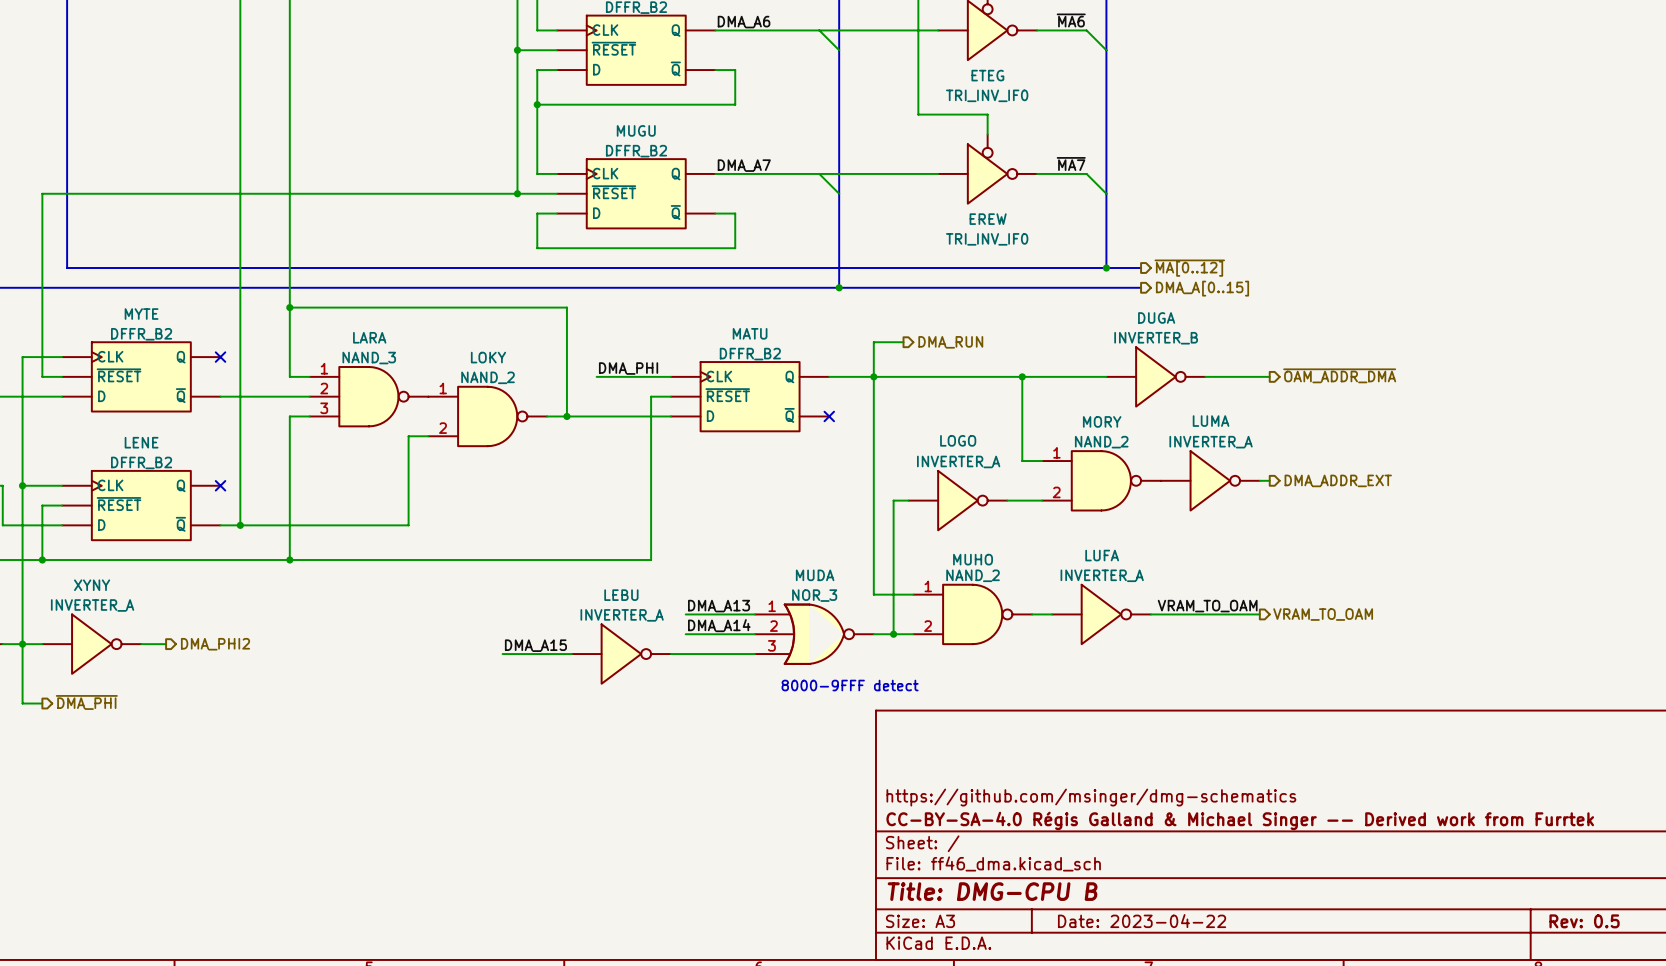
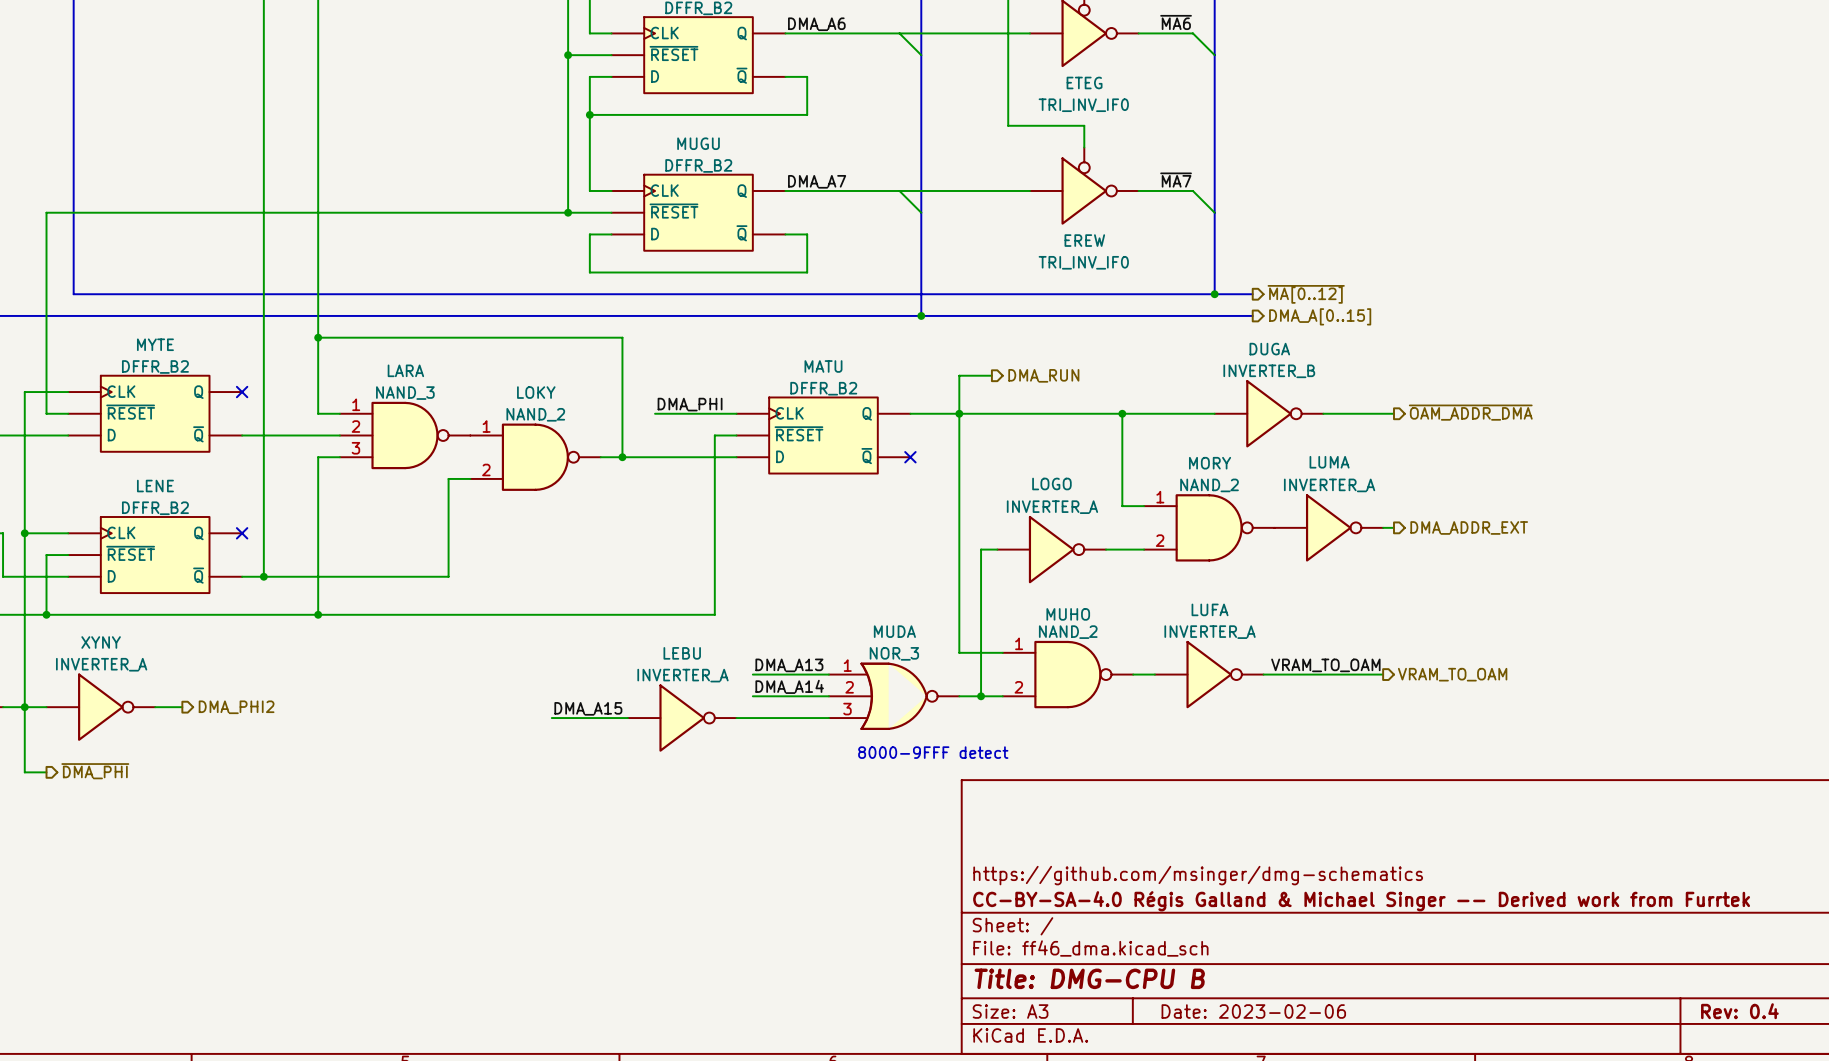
title block: Date: 2023-04-22 (1142, 921) -> Date: 2023-02-06 (1253, 1011)
title block: Rev: 0.5 (1584, 921) -> Rev: 0.4 (1739, 1011)

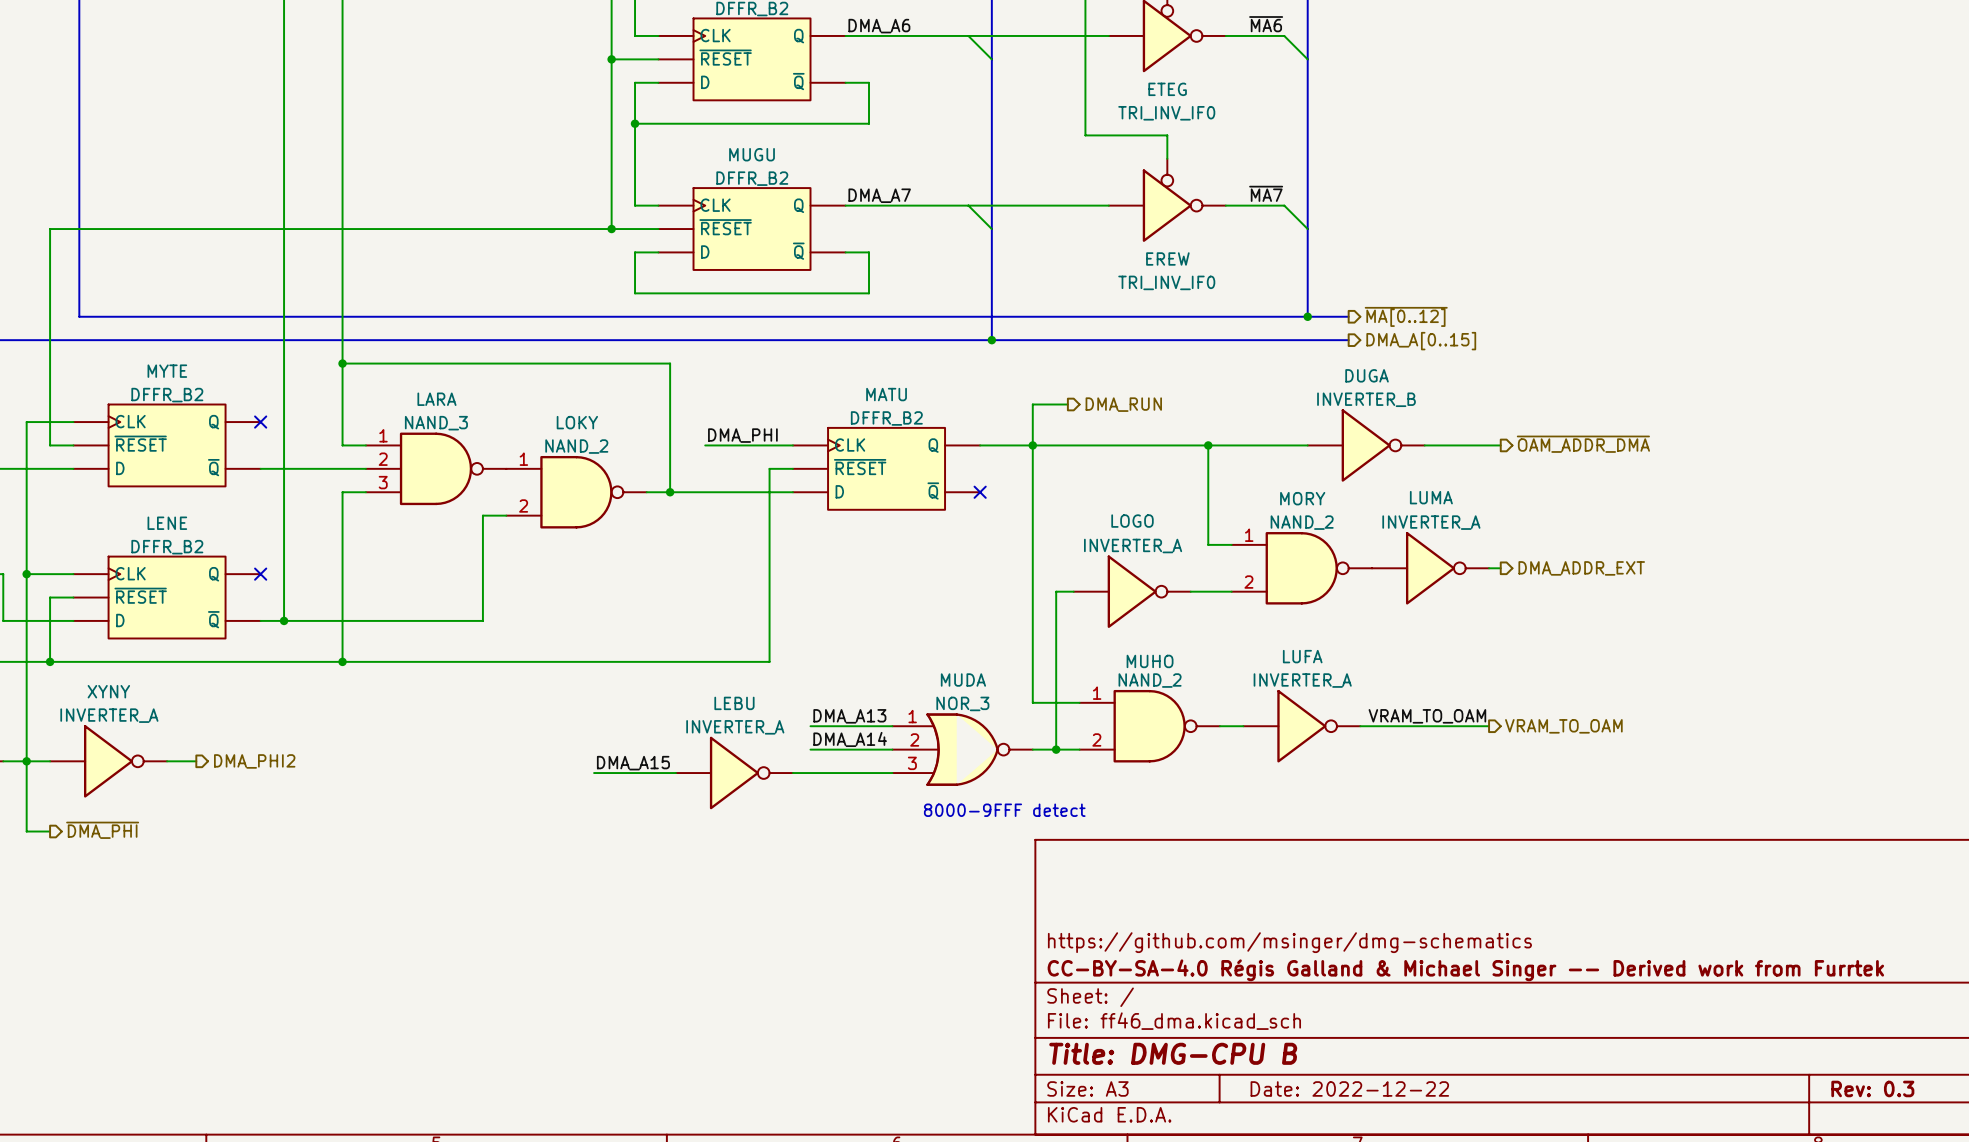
title block: Date: 2023-02-06 (1253, 1011) -> Date: 2022-12-22 (1349, 1088)
title block: Rev: 0.4 (1739, 1011) -> Rev: 0.3 (1872, 1088)

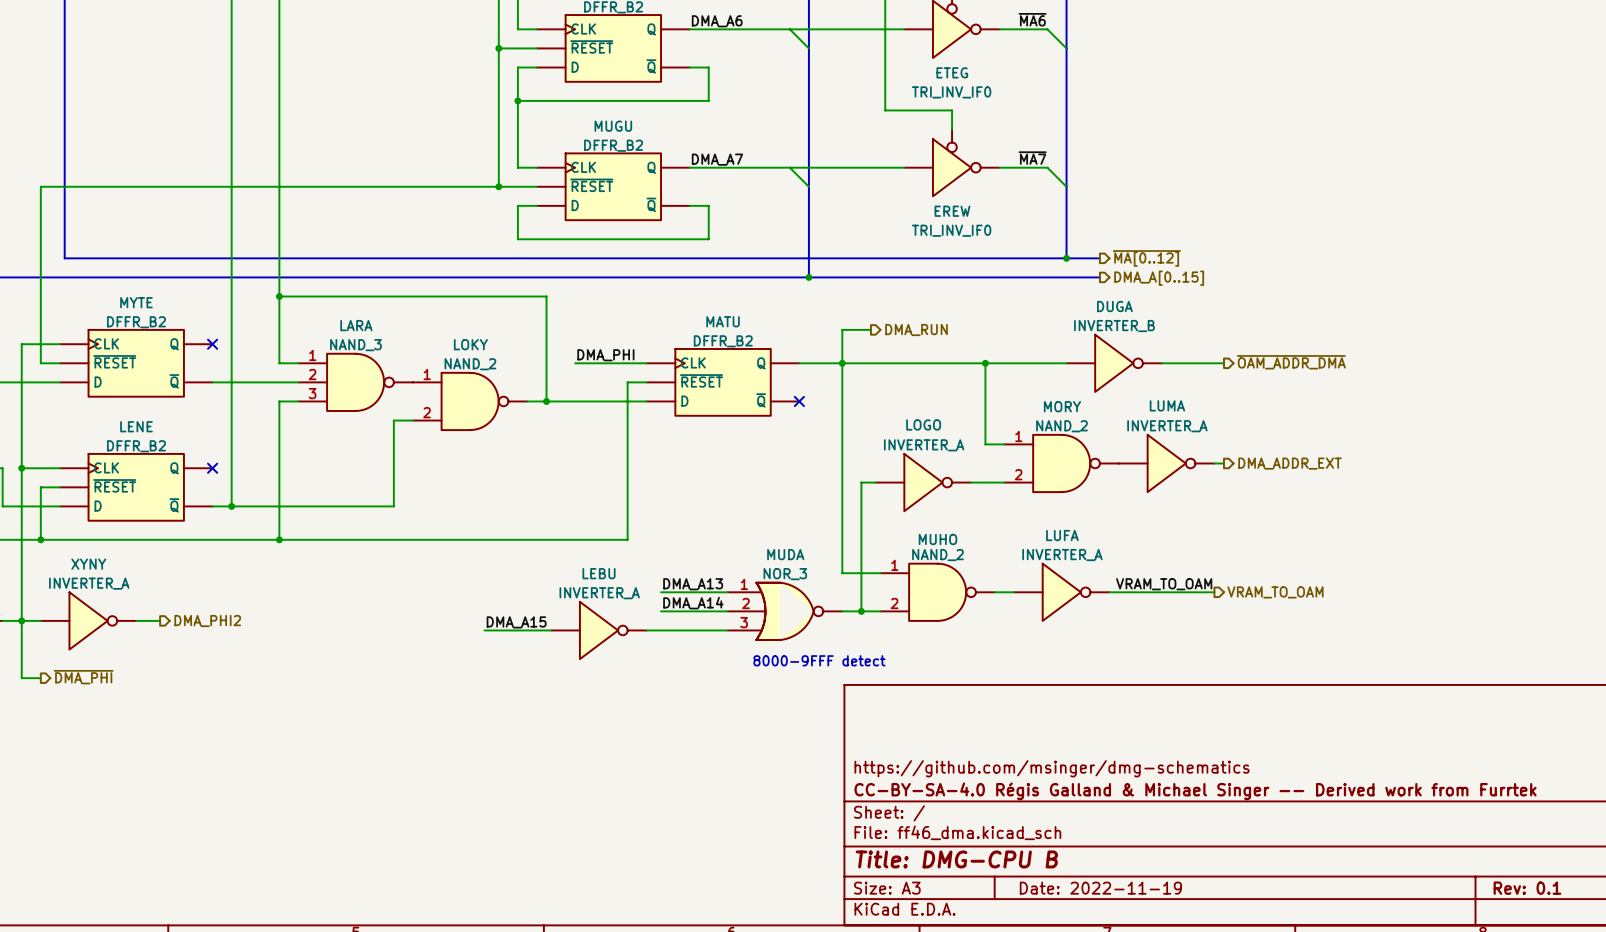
title block: Date: 2022-12-22 (1349, 1088) -> Date: 2022-11-19 (1100, 888)
title block: Rev: 0.3 (1872, 1088) -> Rev: 0.1 (1527, 888)

